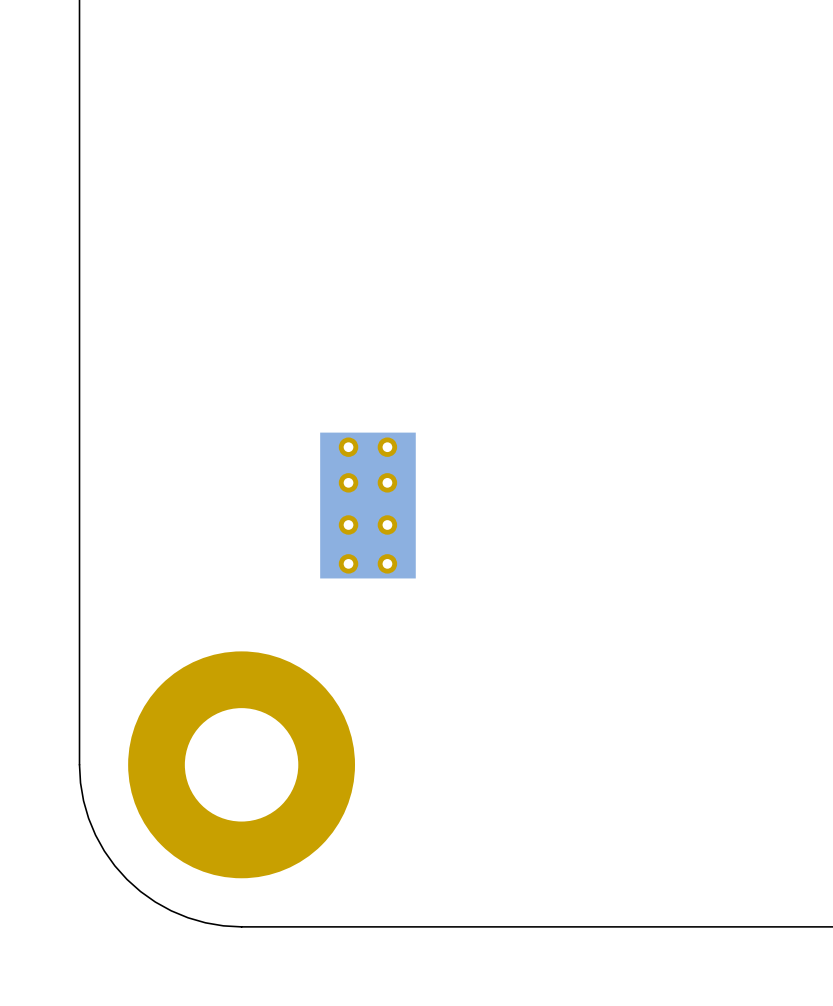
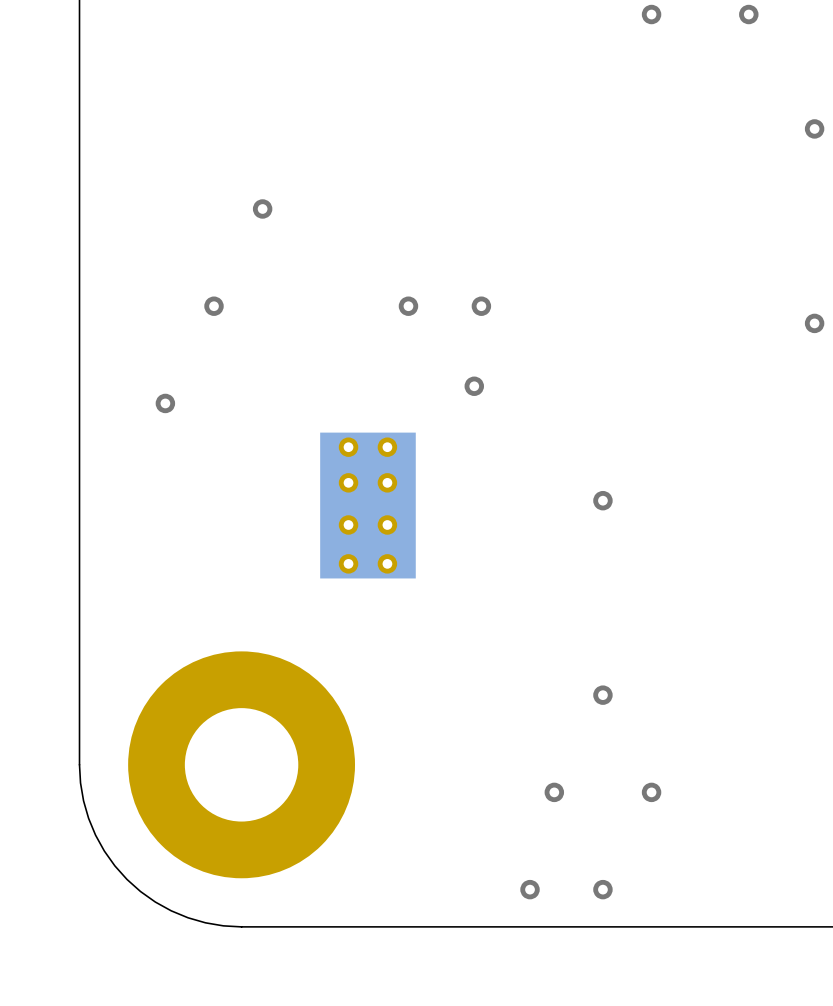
via: none -> (651, 14)
via: none -> (748, 14)
via: none -> (814, 128)
via: none -> (262, 208)
via: none -> (214, 306)
via: none -> (408, 306)
via: none -> (481, 306)
via: none -> (814, 323)
via: none -> (474, 386)
via: none -> (165, 403)
via: none -> (602, 500)
via: none -> (602, 695)
via: none -> (554, 792)
via: none -> (651, 792)
via: none -> (530, 889)
via: none -> (602, 889)

